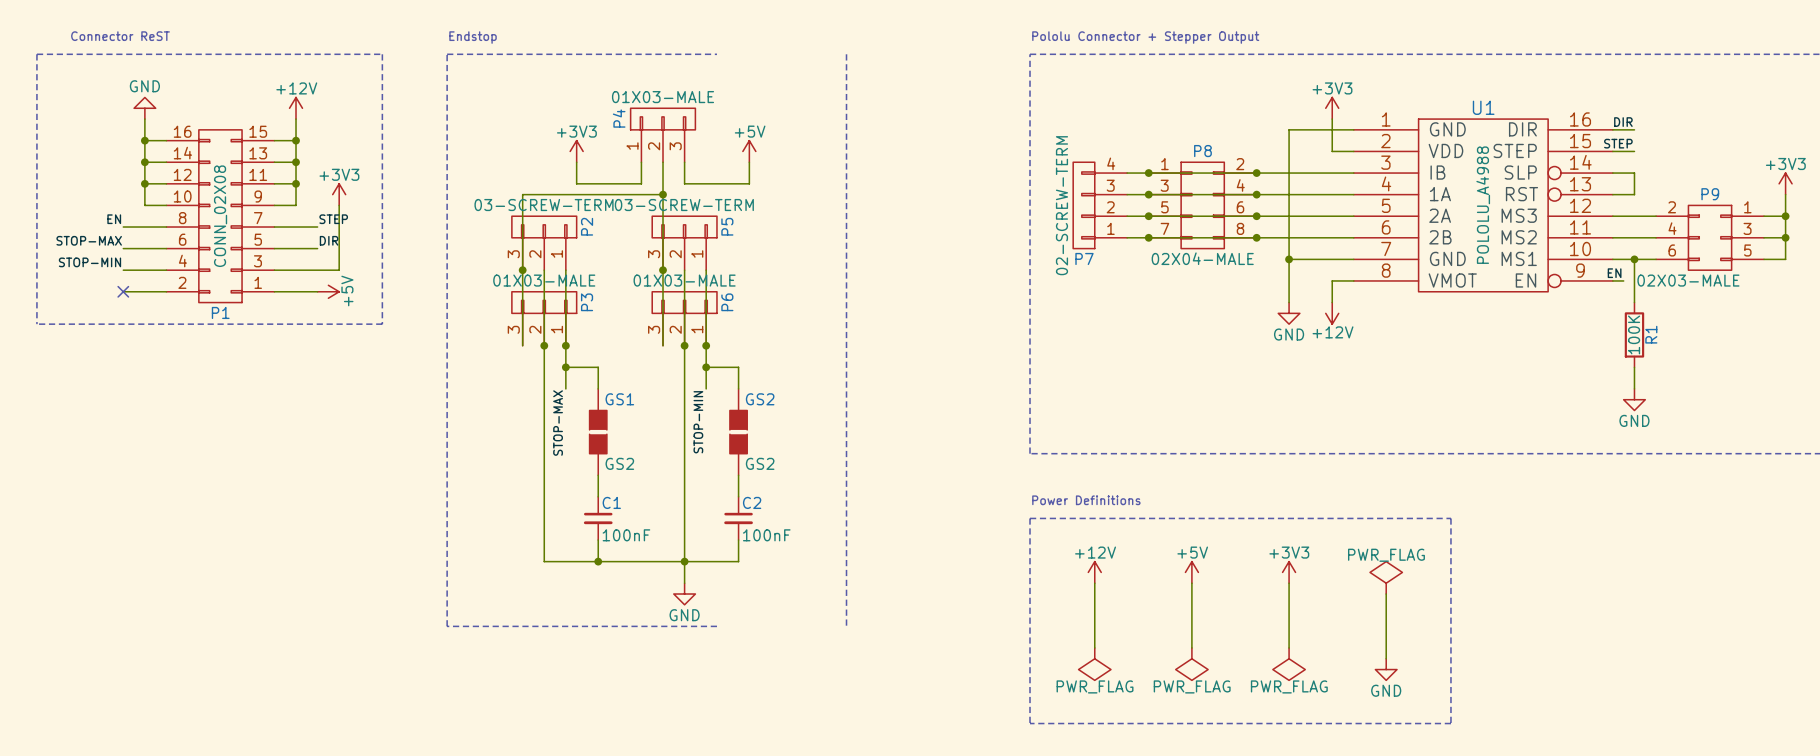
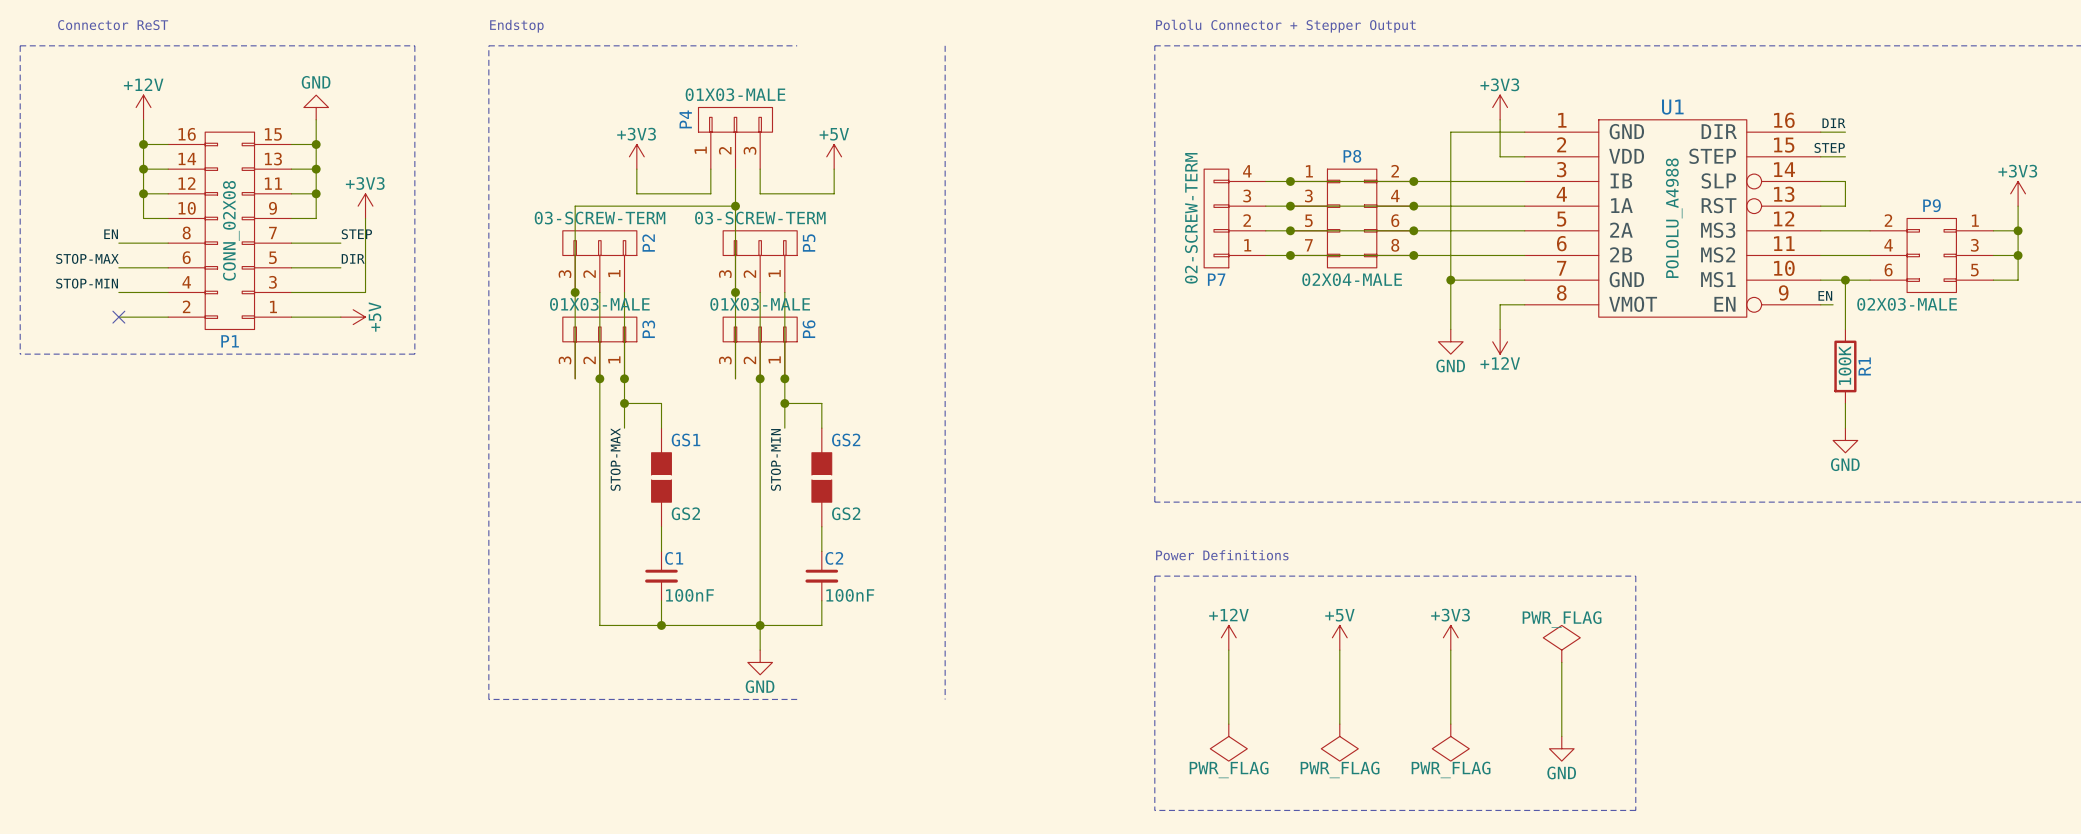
power symbol: GND (144, 108) -> +12V (143, 107)
power symbol: +12V (296, 108) -> GND (316, 107)

